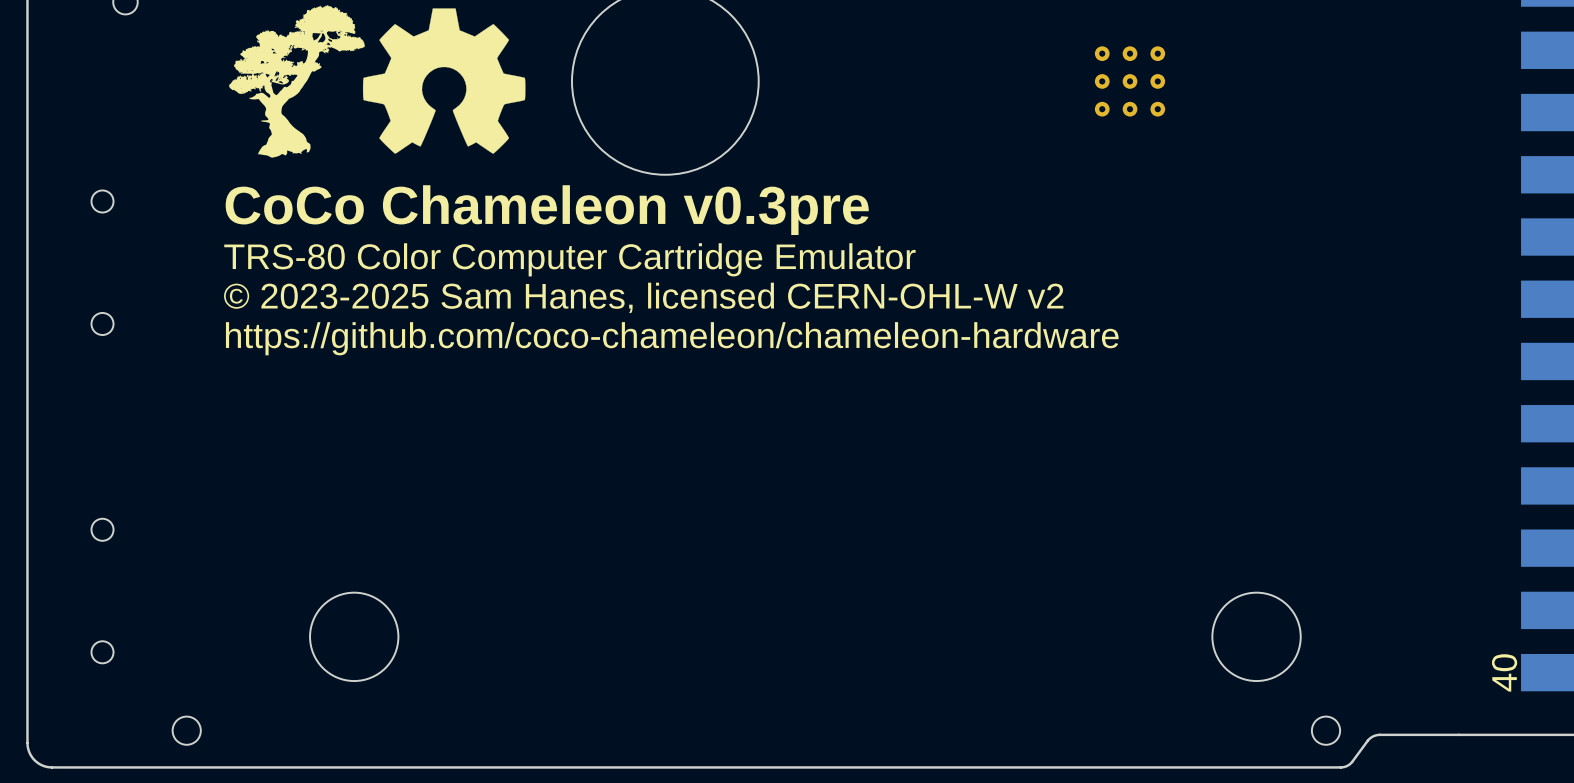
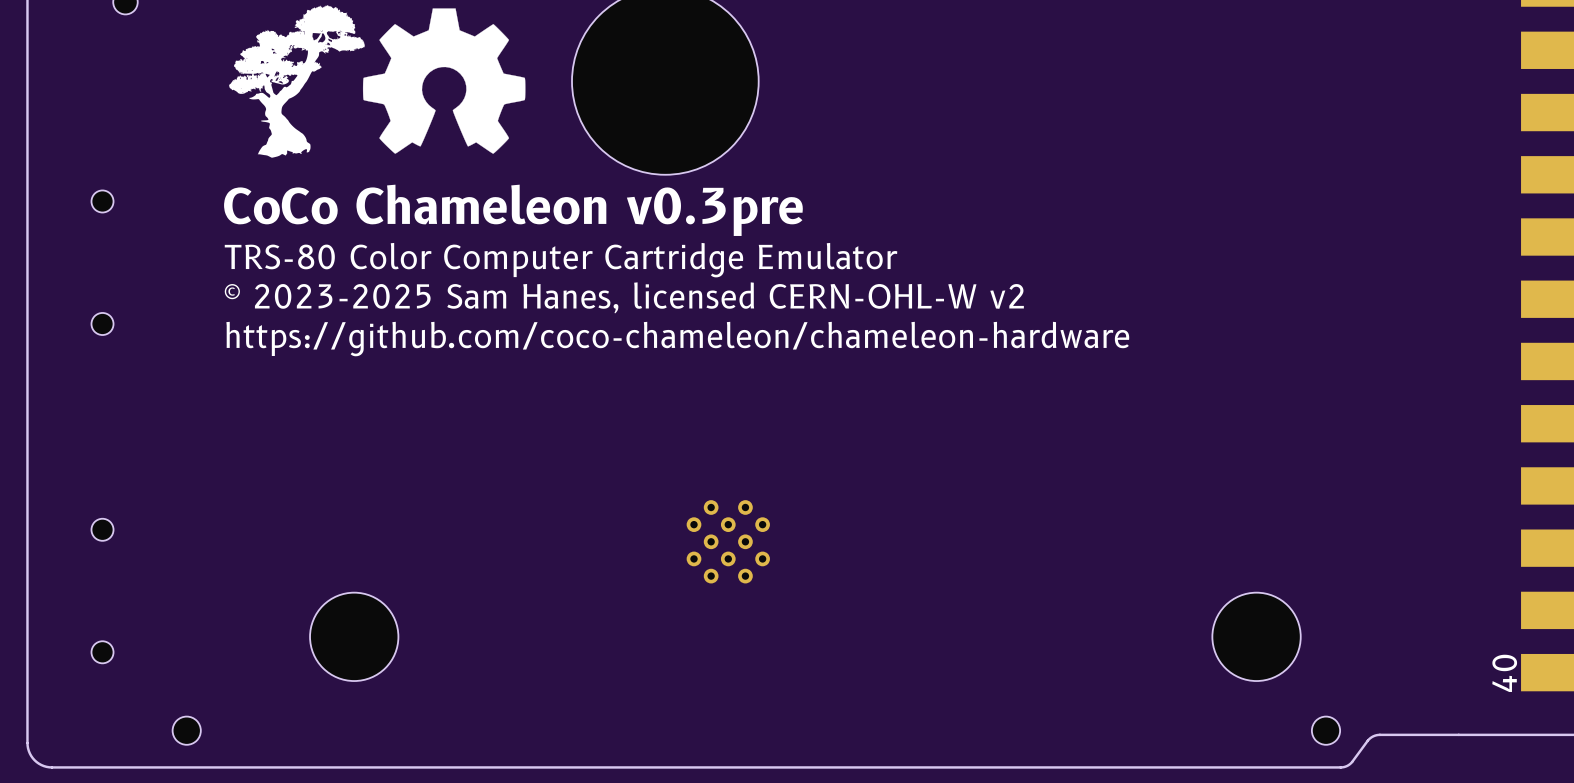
part: (1130, 81) -> none
part: none -> (728, 541)

